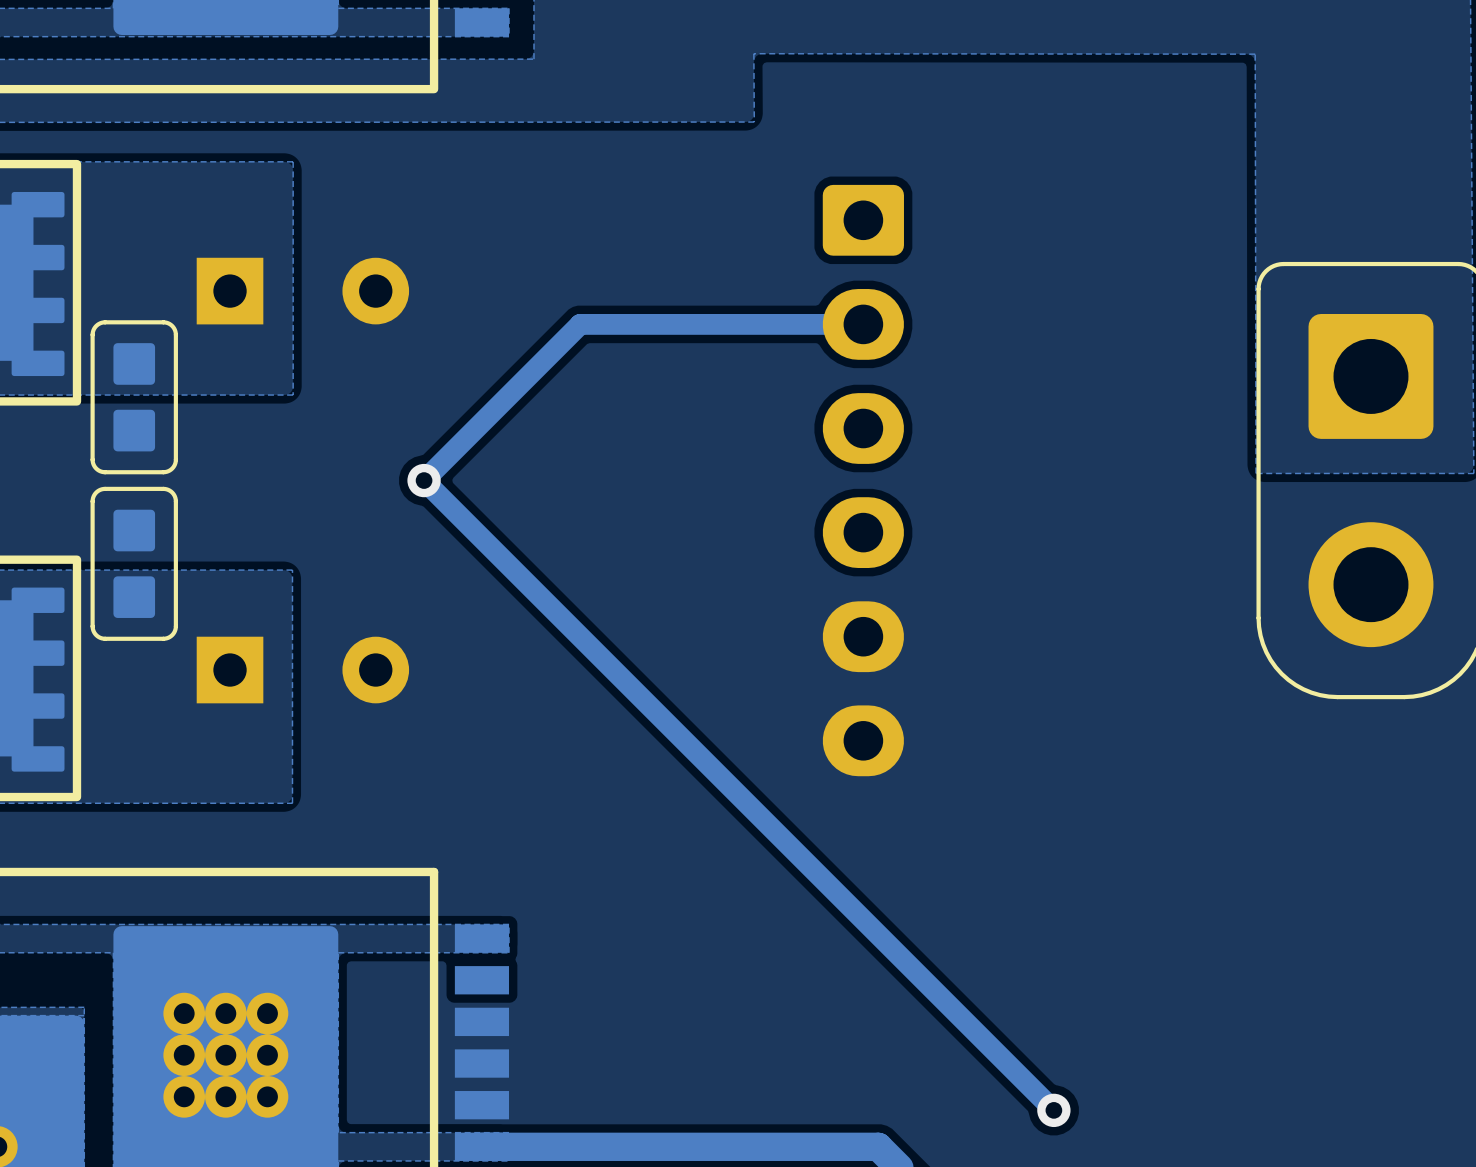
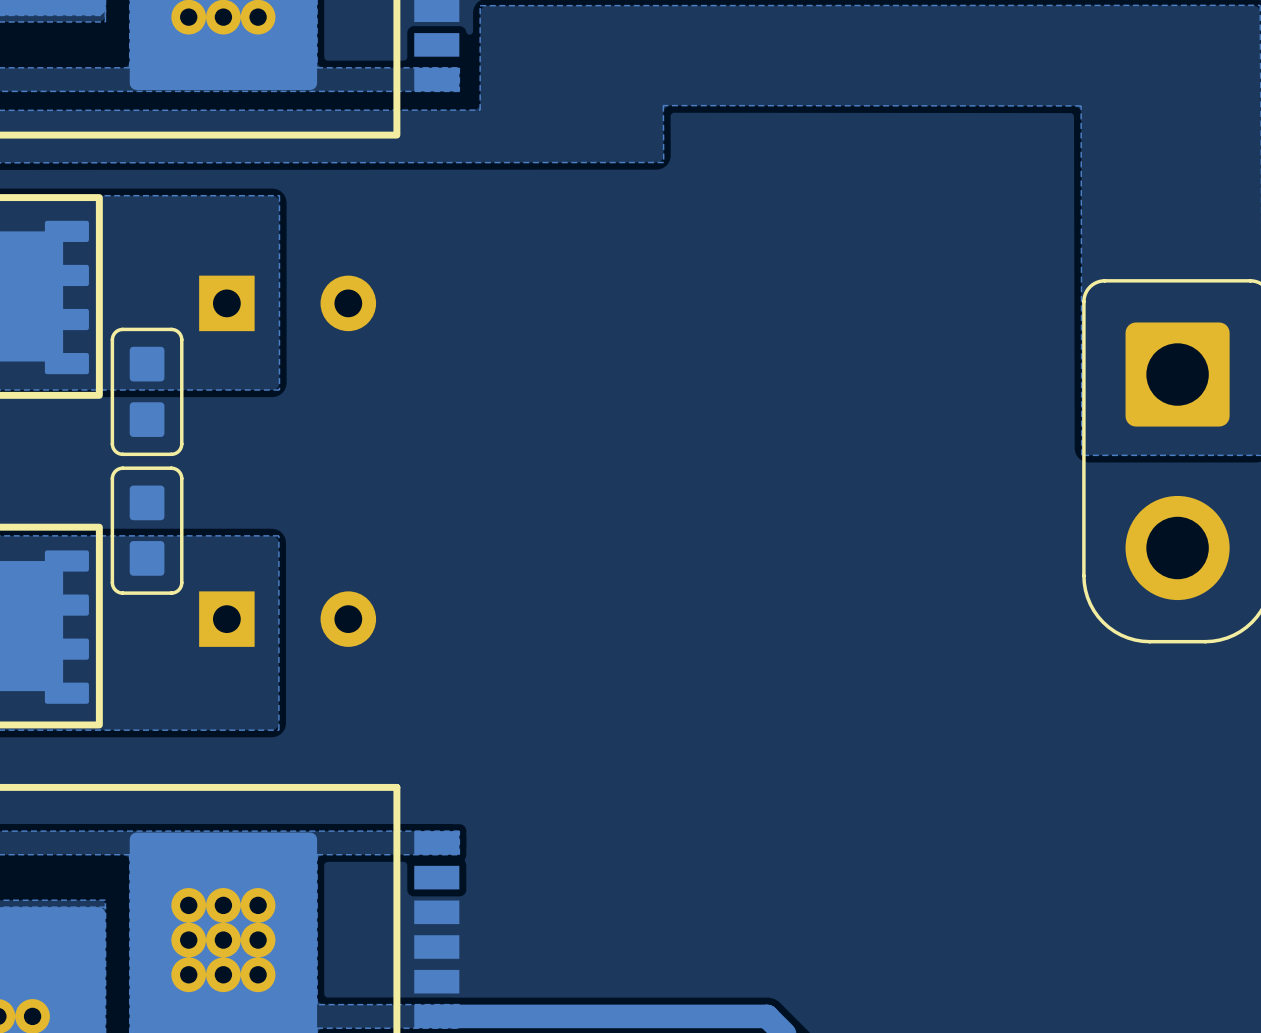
track: (863, 324) (580, 324) (424, 480) (1053, 1110) -> none
via: (424, 480) -> none
part: (863, 480) -> none
via: (1053, 1110) -> none

